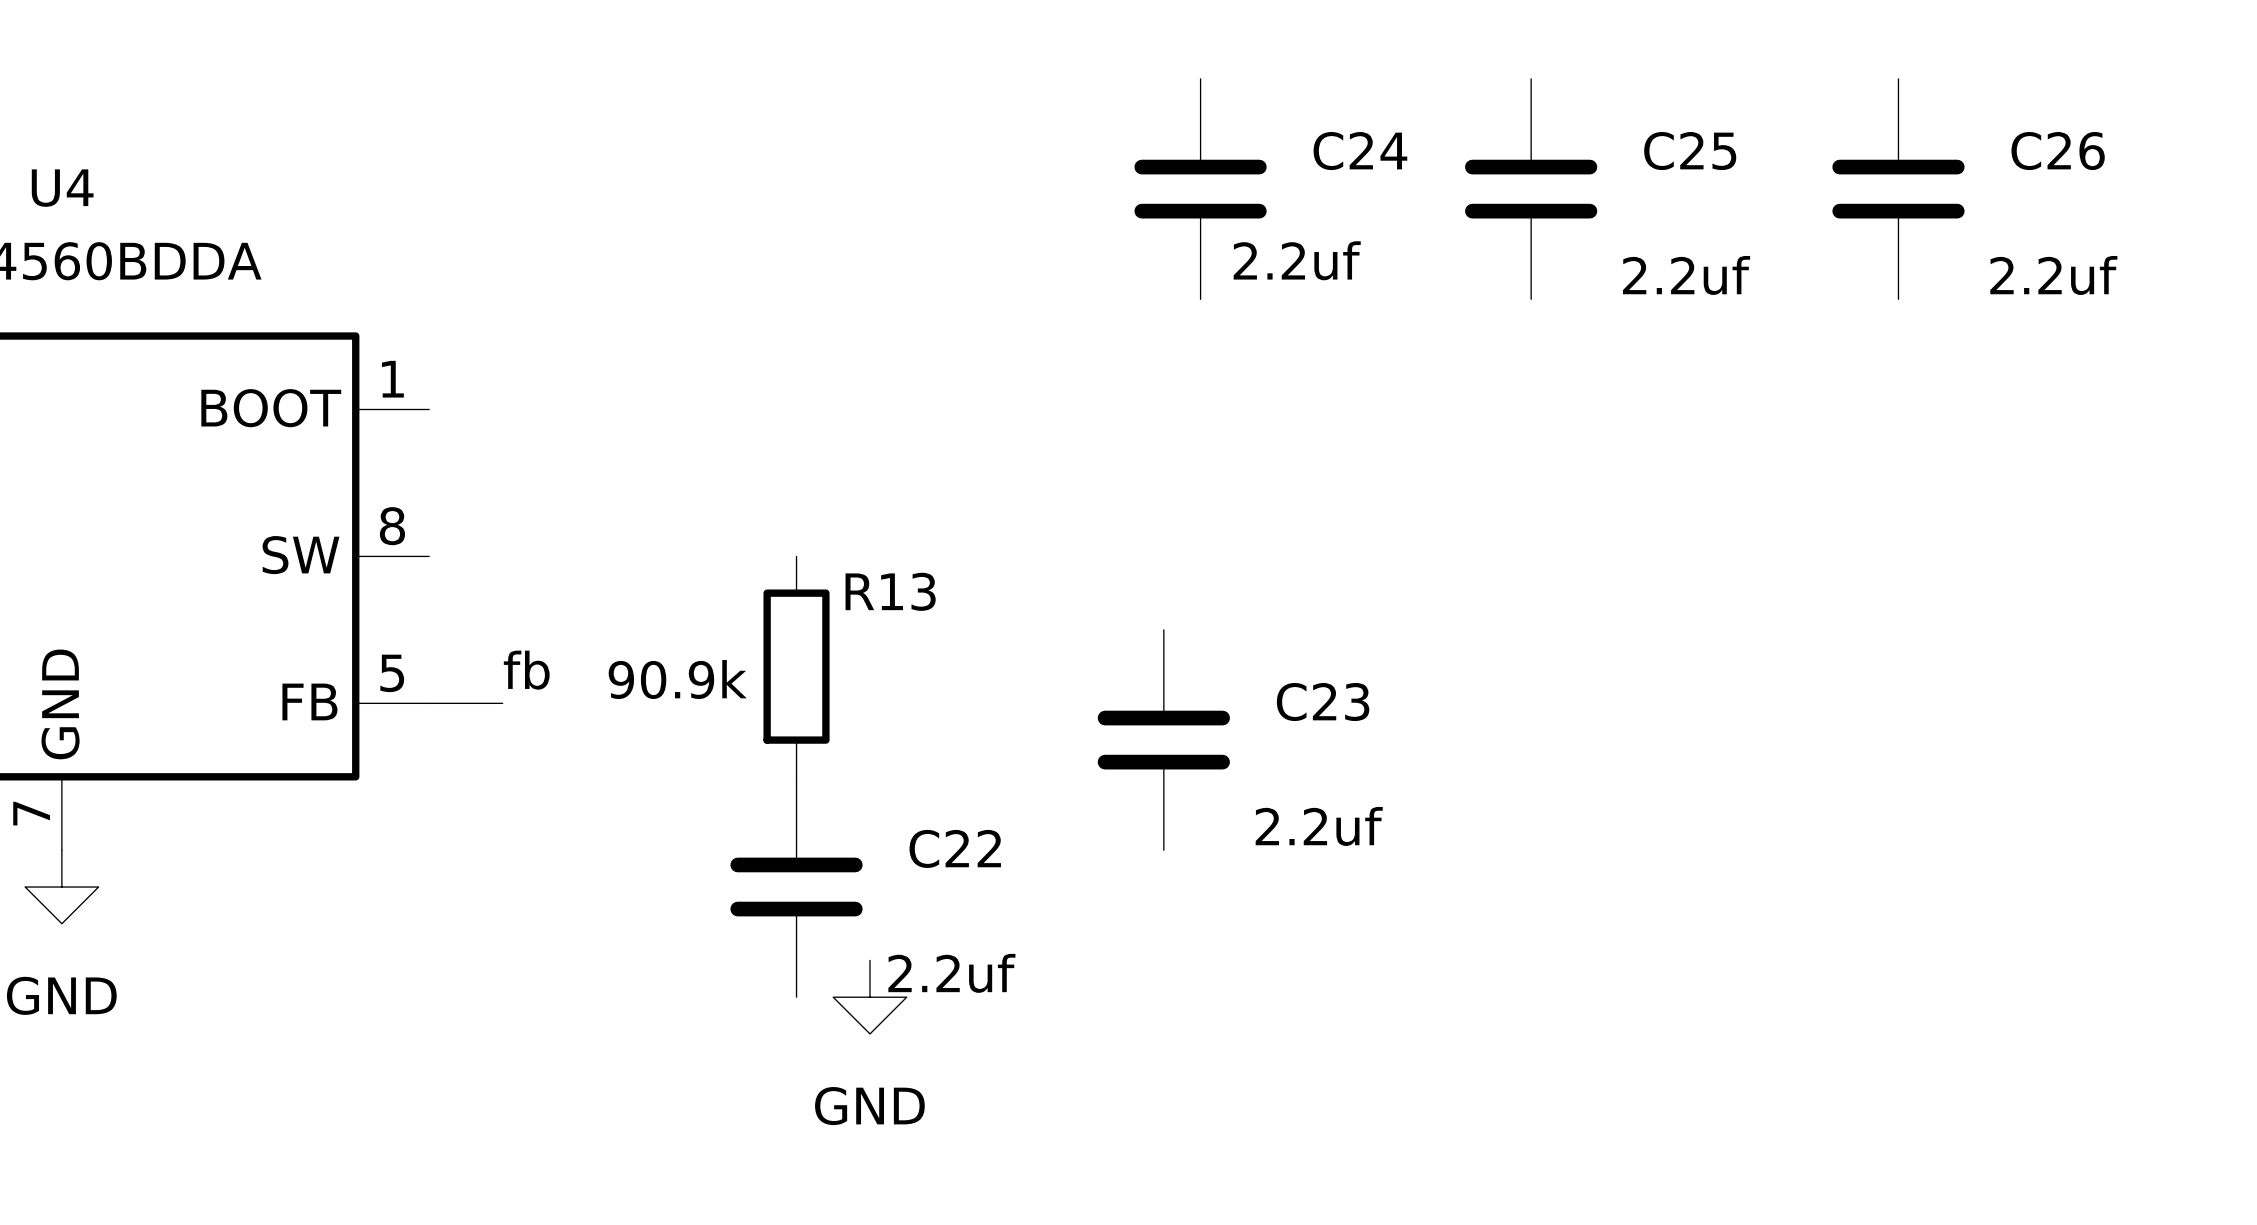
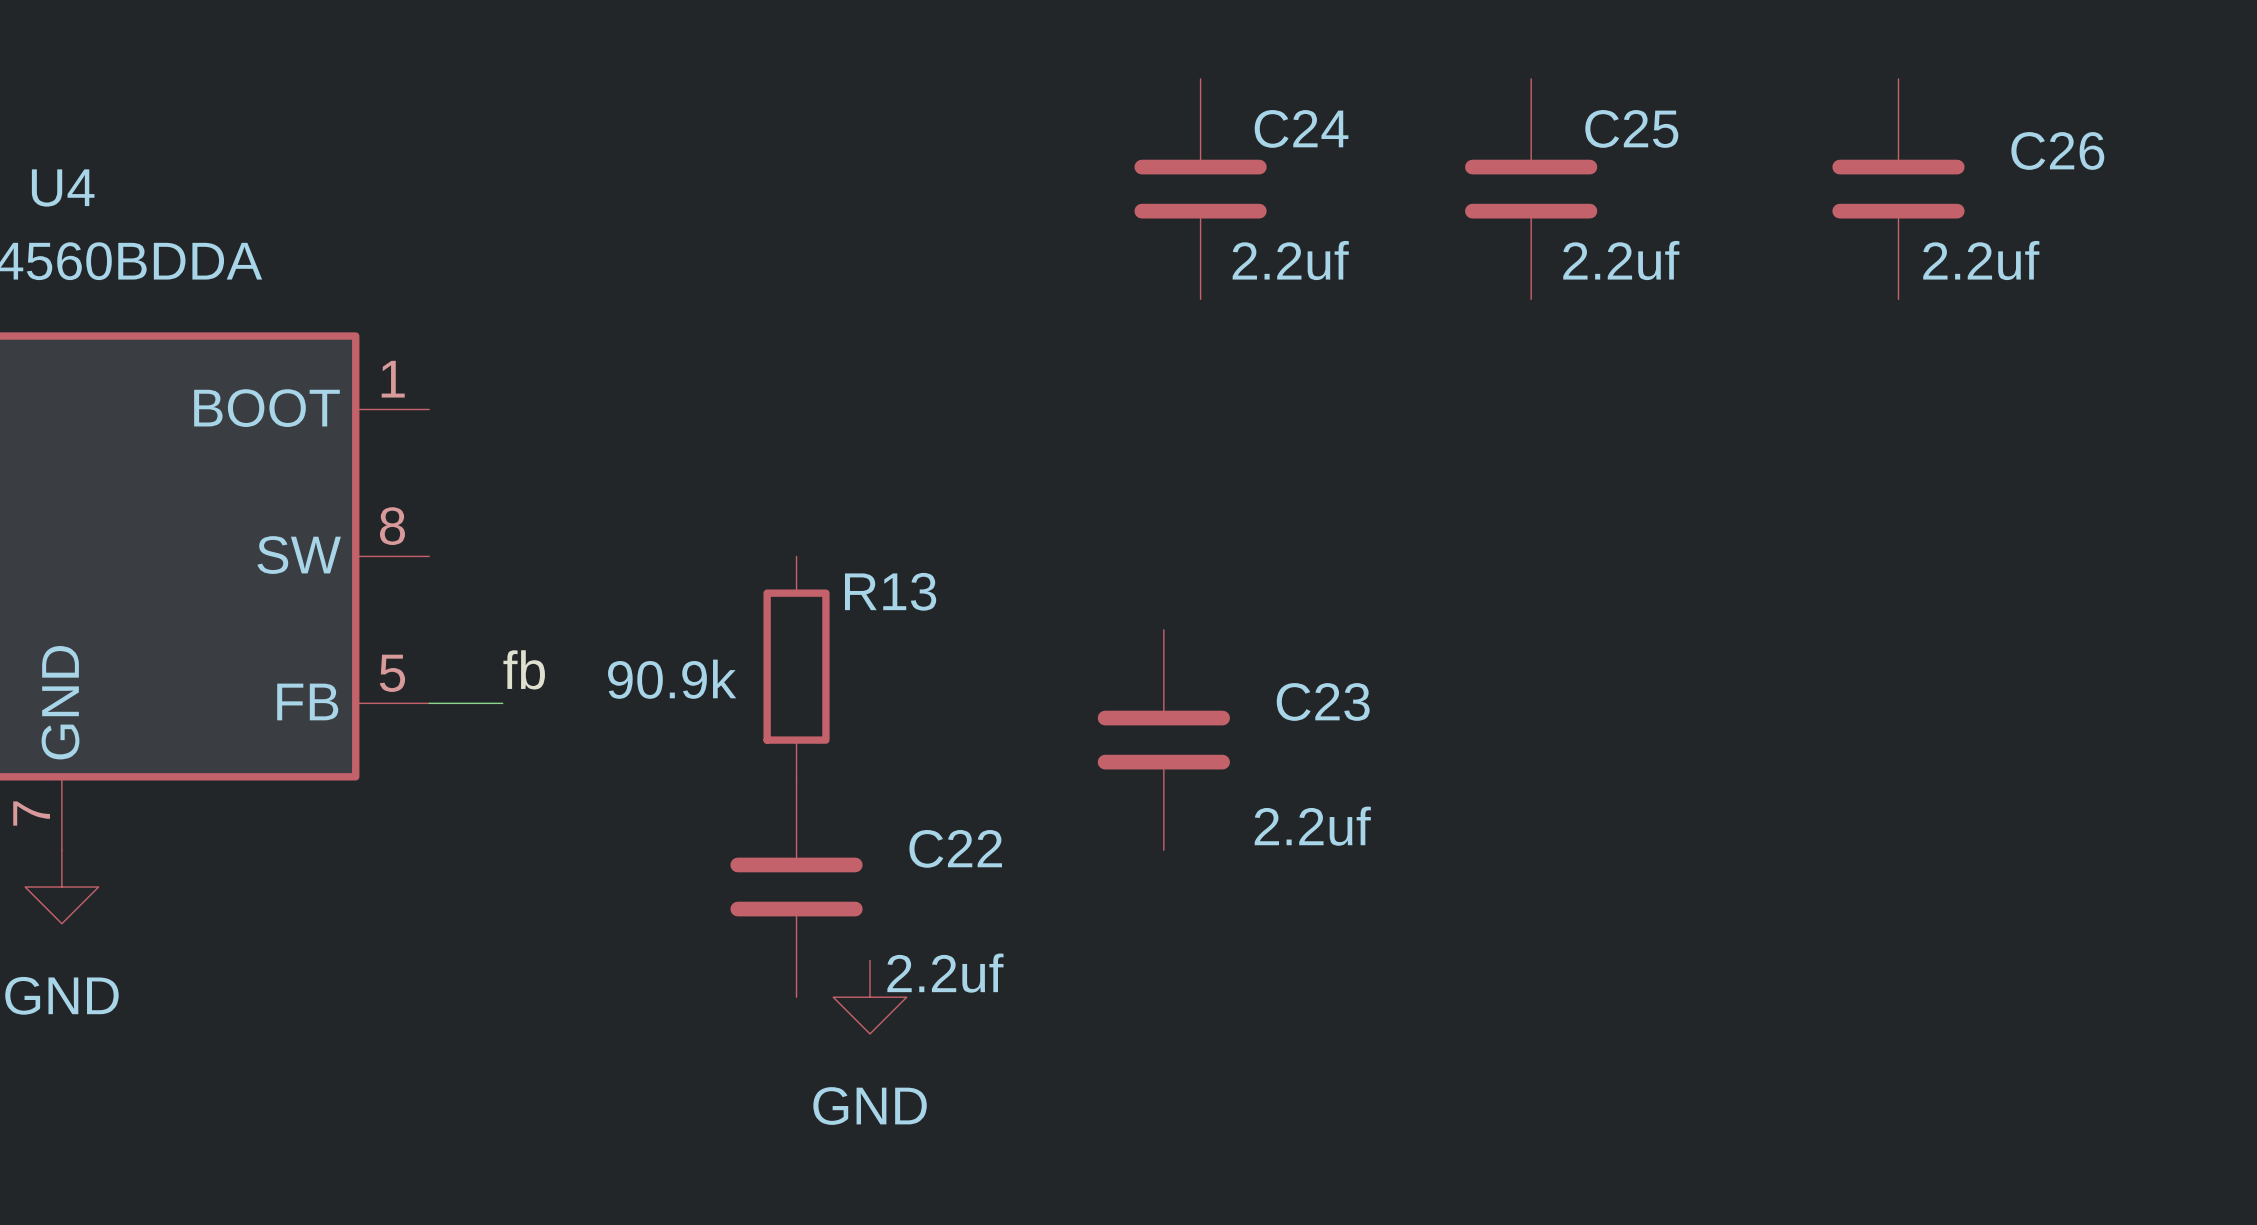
C24 name position: C24 (1360, 151) -> C24 (1301, 128)
C25 name position: C25 (1690, 151) -> C25 (1631, 128)
C25 value position: 2.2uf (1686, 275) -> 2.2uf (1621, 260)
C26 value position: 2.2uf (2053, 275) -> 2.2uf (1981, 260)

